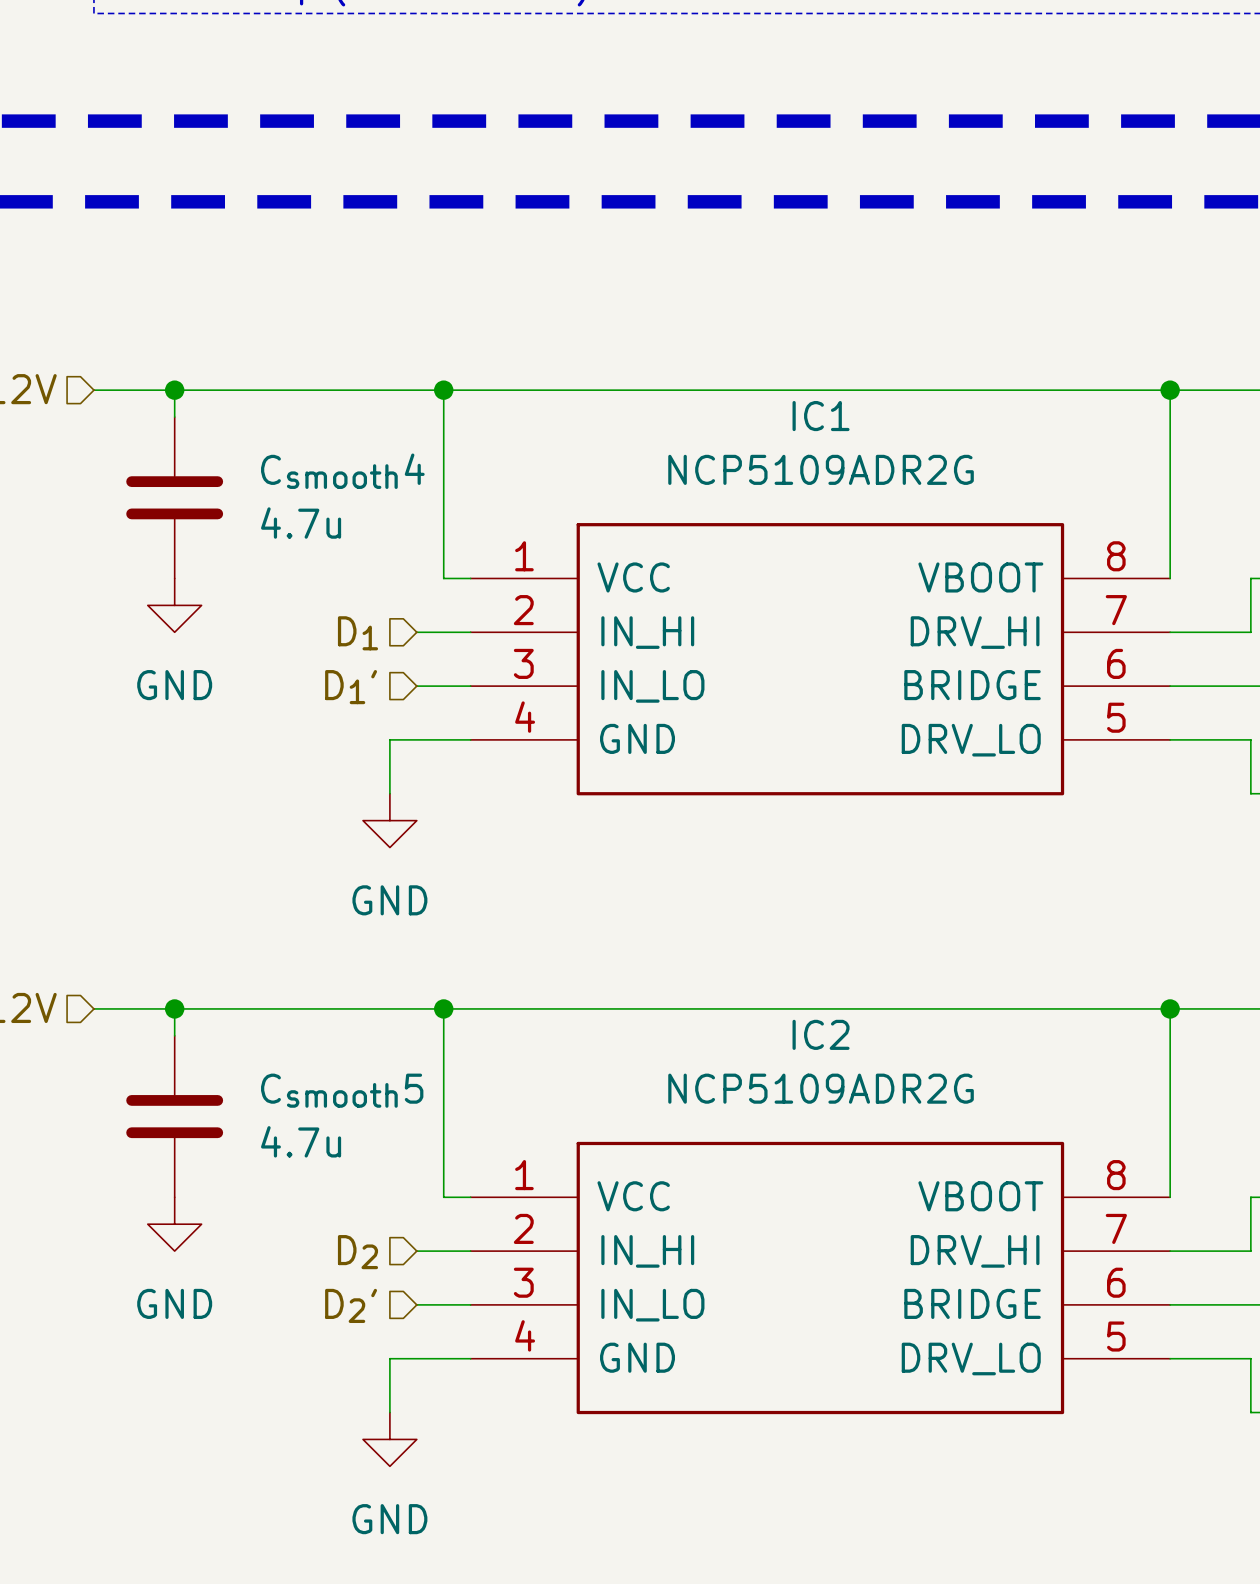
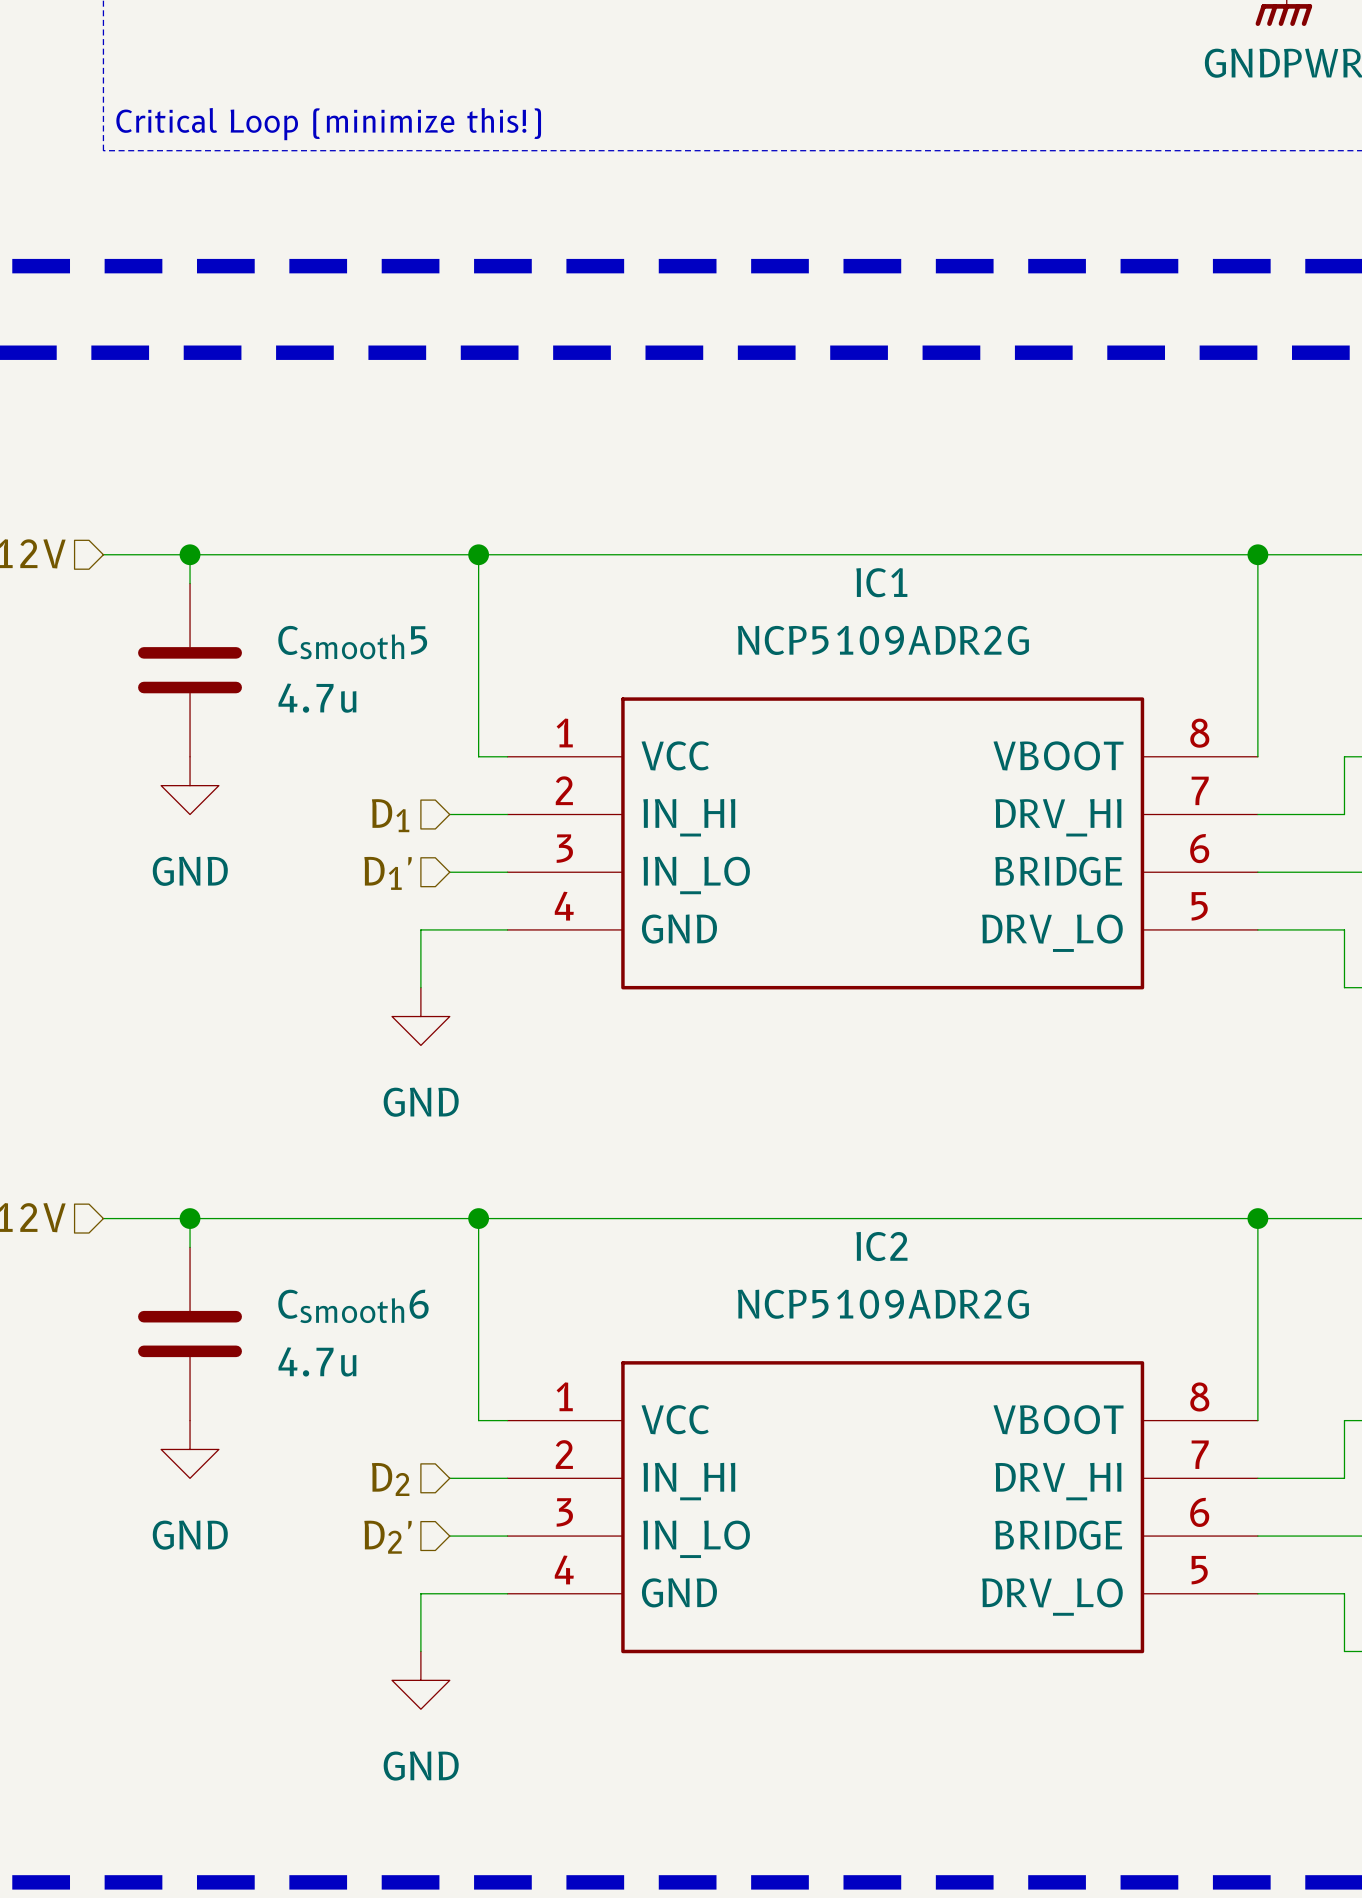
Csmooth4 name: Csmooth4 (342, 471) -> Csmooth5 (352, 642)
Csmooth5 name: Csmooth5 (342, 1090) -> Csmooth6 (353, 1306)

